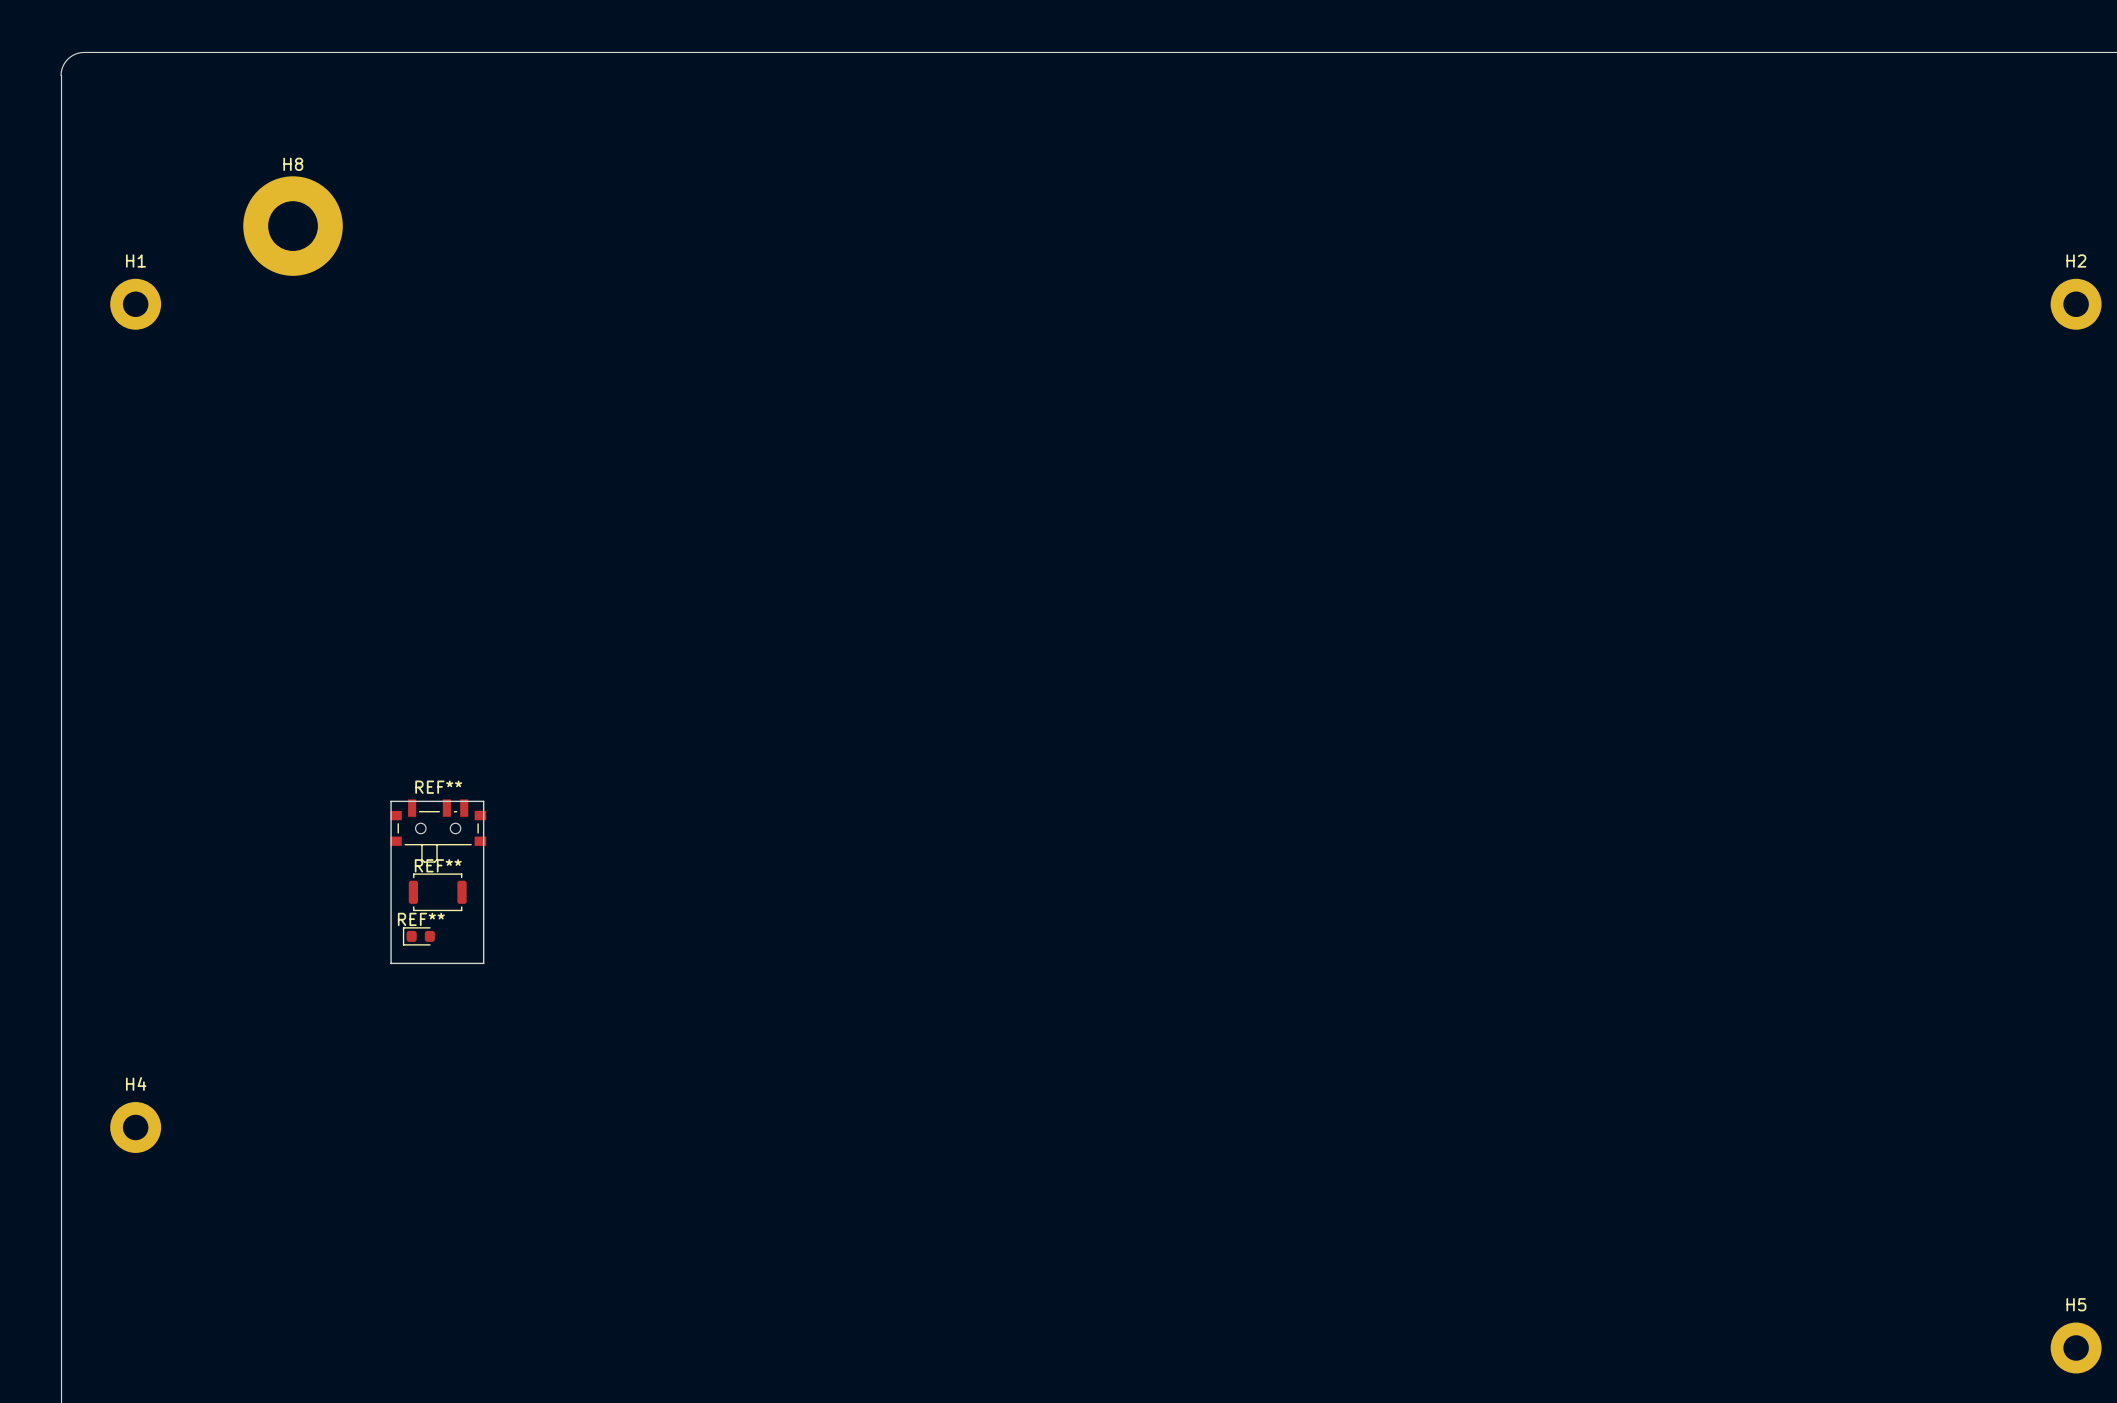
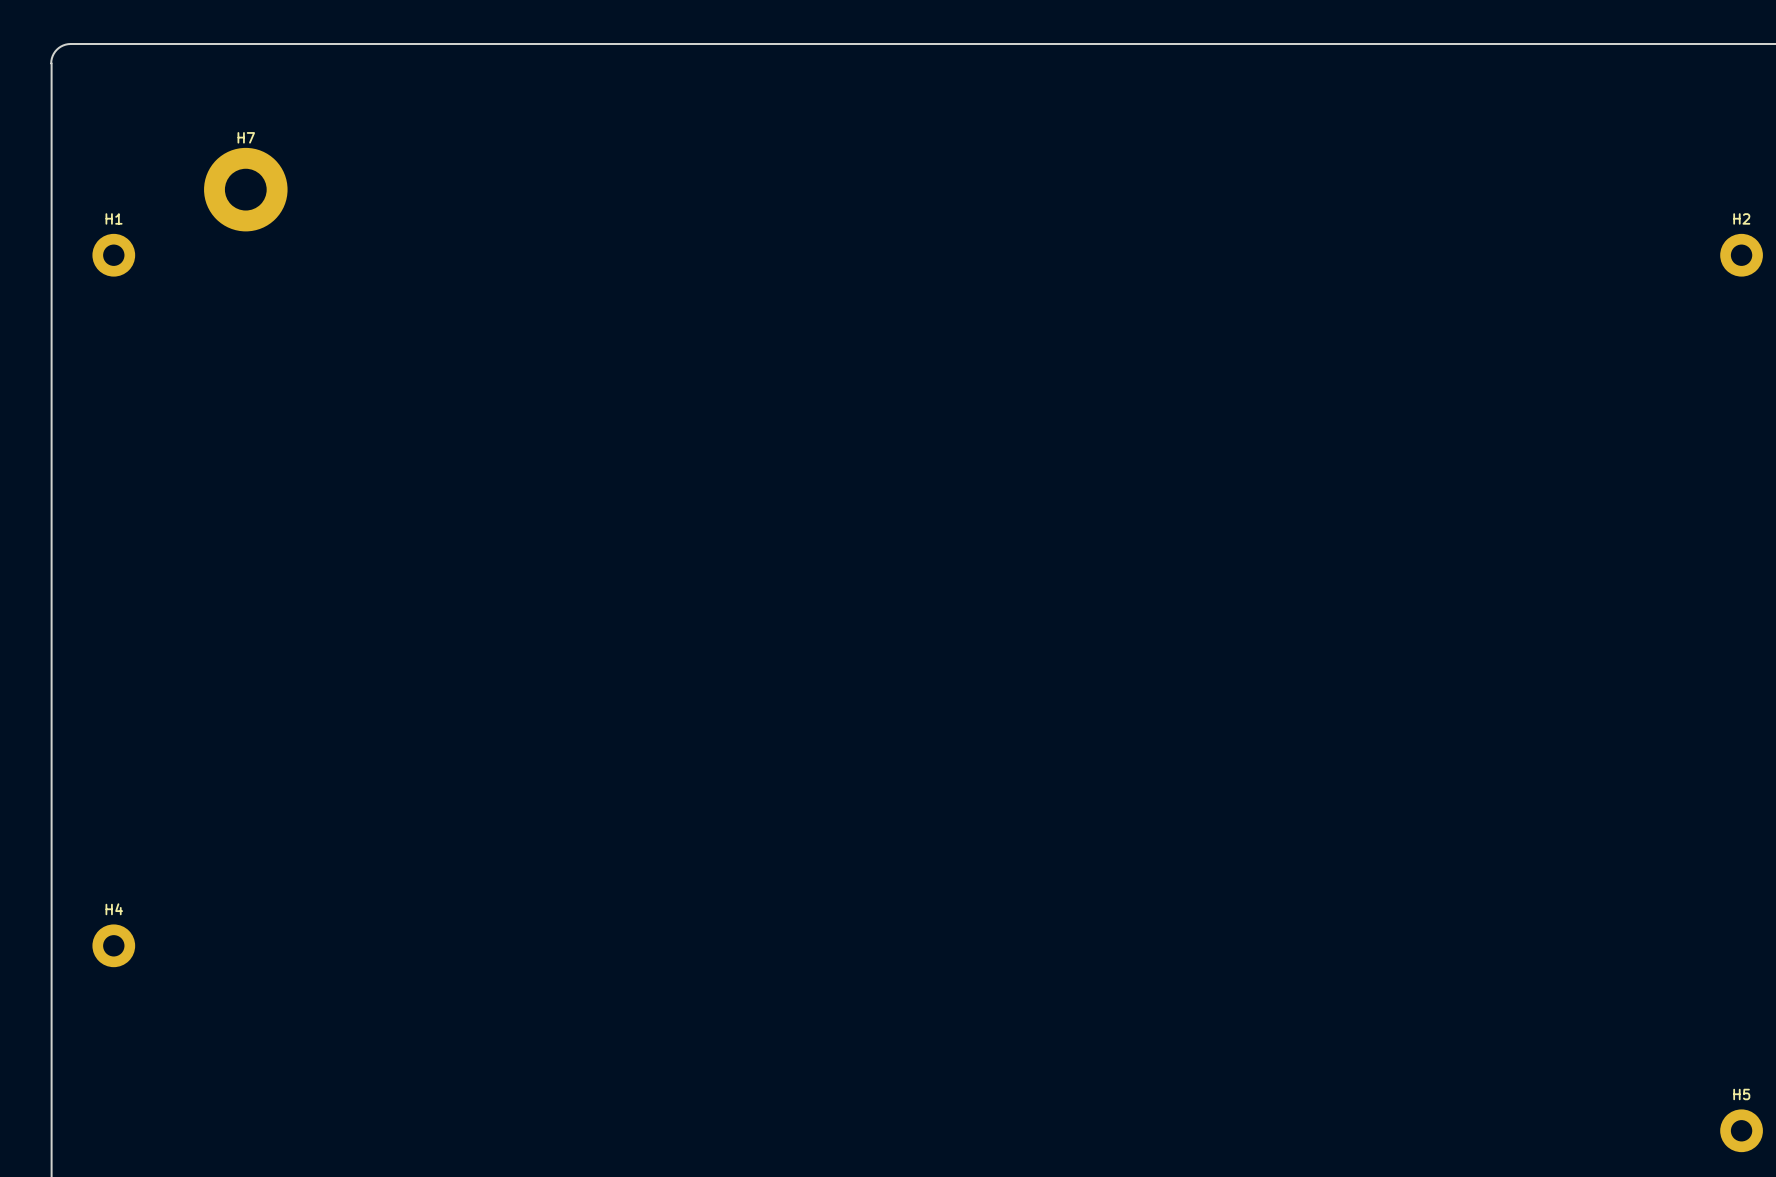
H8 name: H8 (293, 164) -> H7 (246, 137)
board edge: (391, 801) (391, 963) (483, 963) (483, 801) (391, 801) -> none
REF**: (438, 831) -> none
REF**: (437, 892) -> none
REF**: (418, 936) -> none

